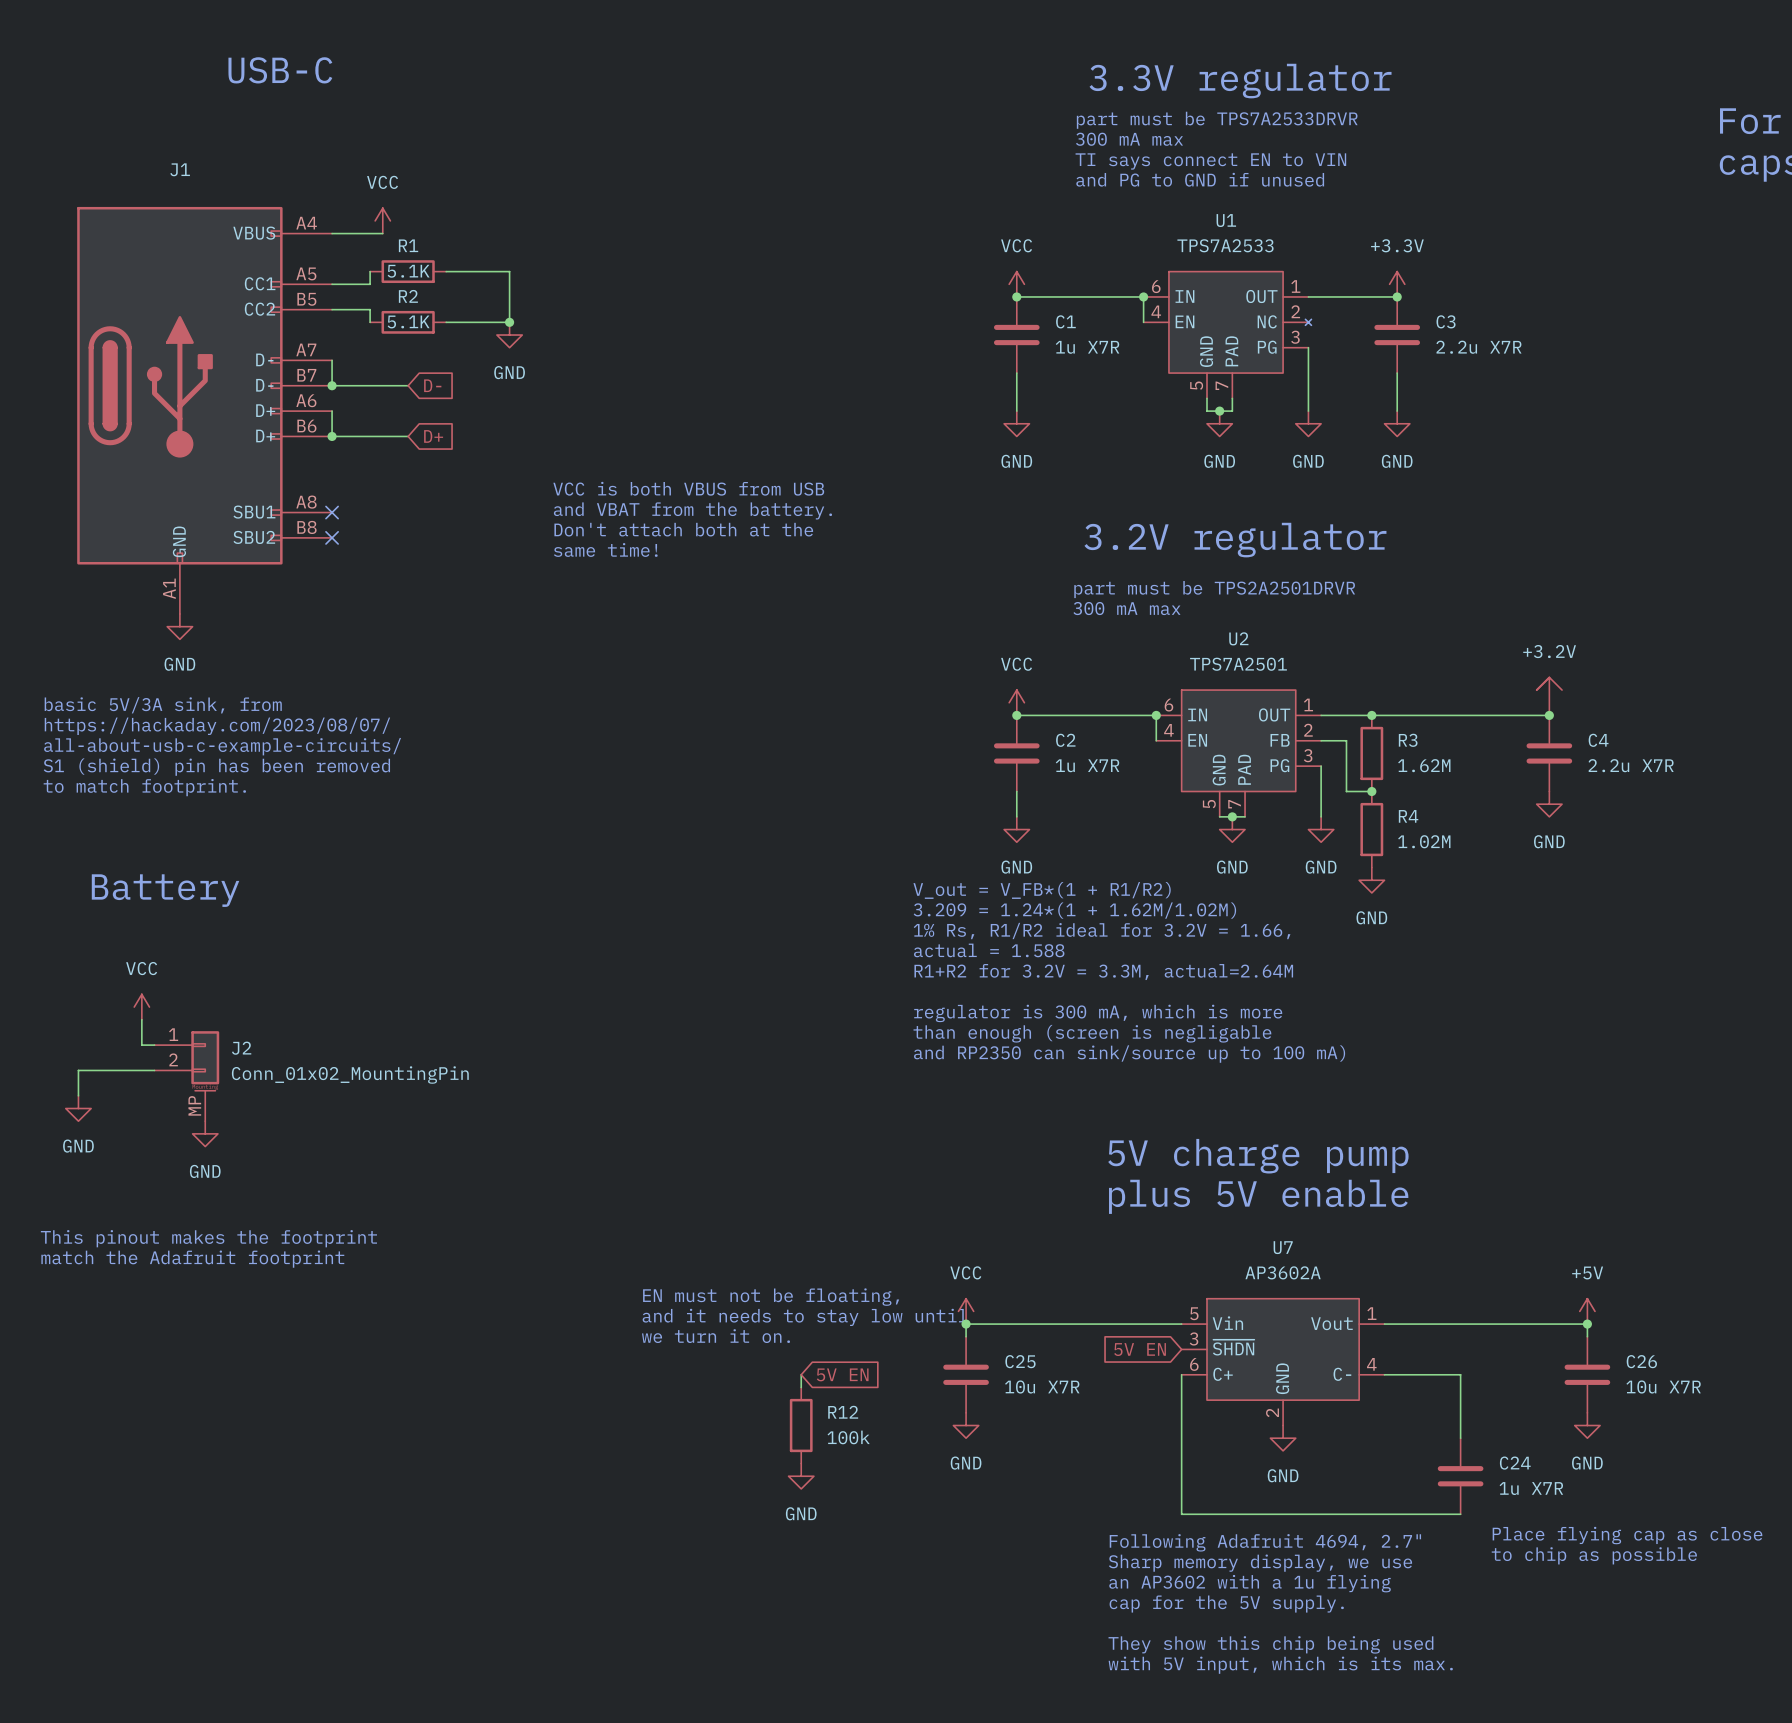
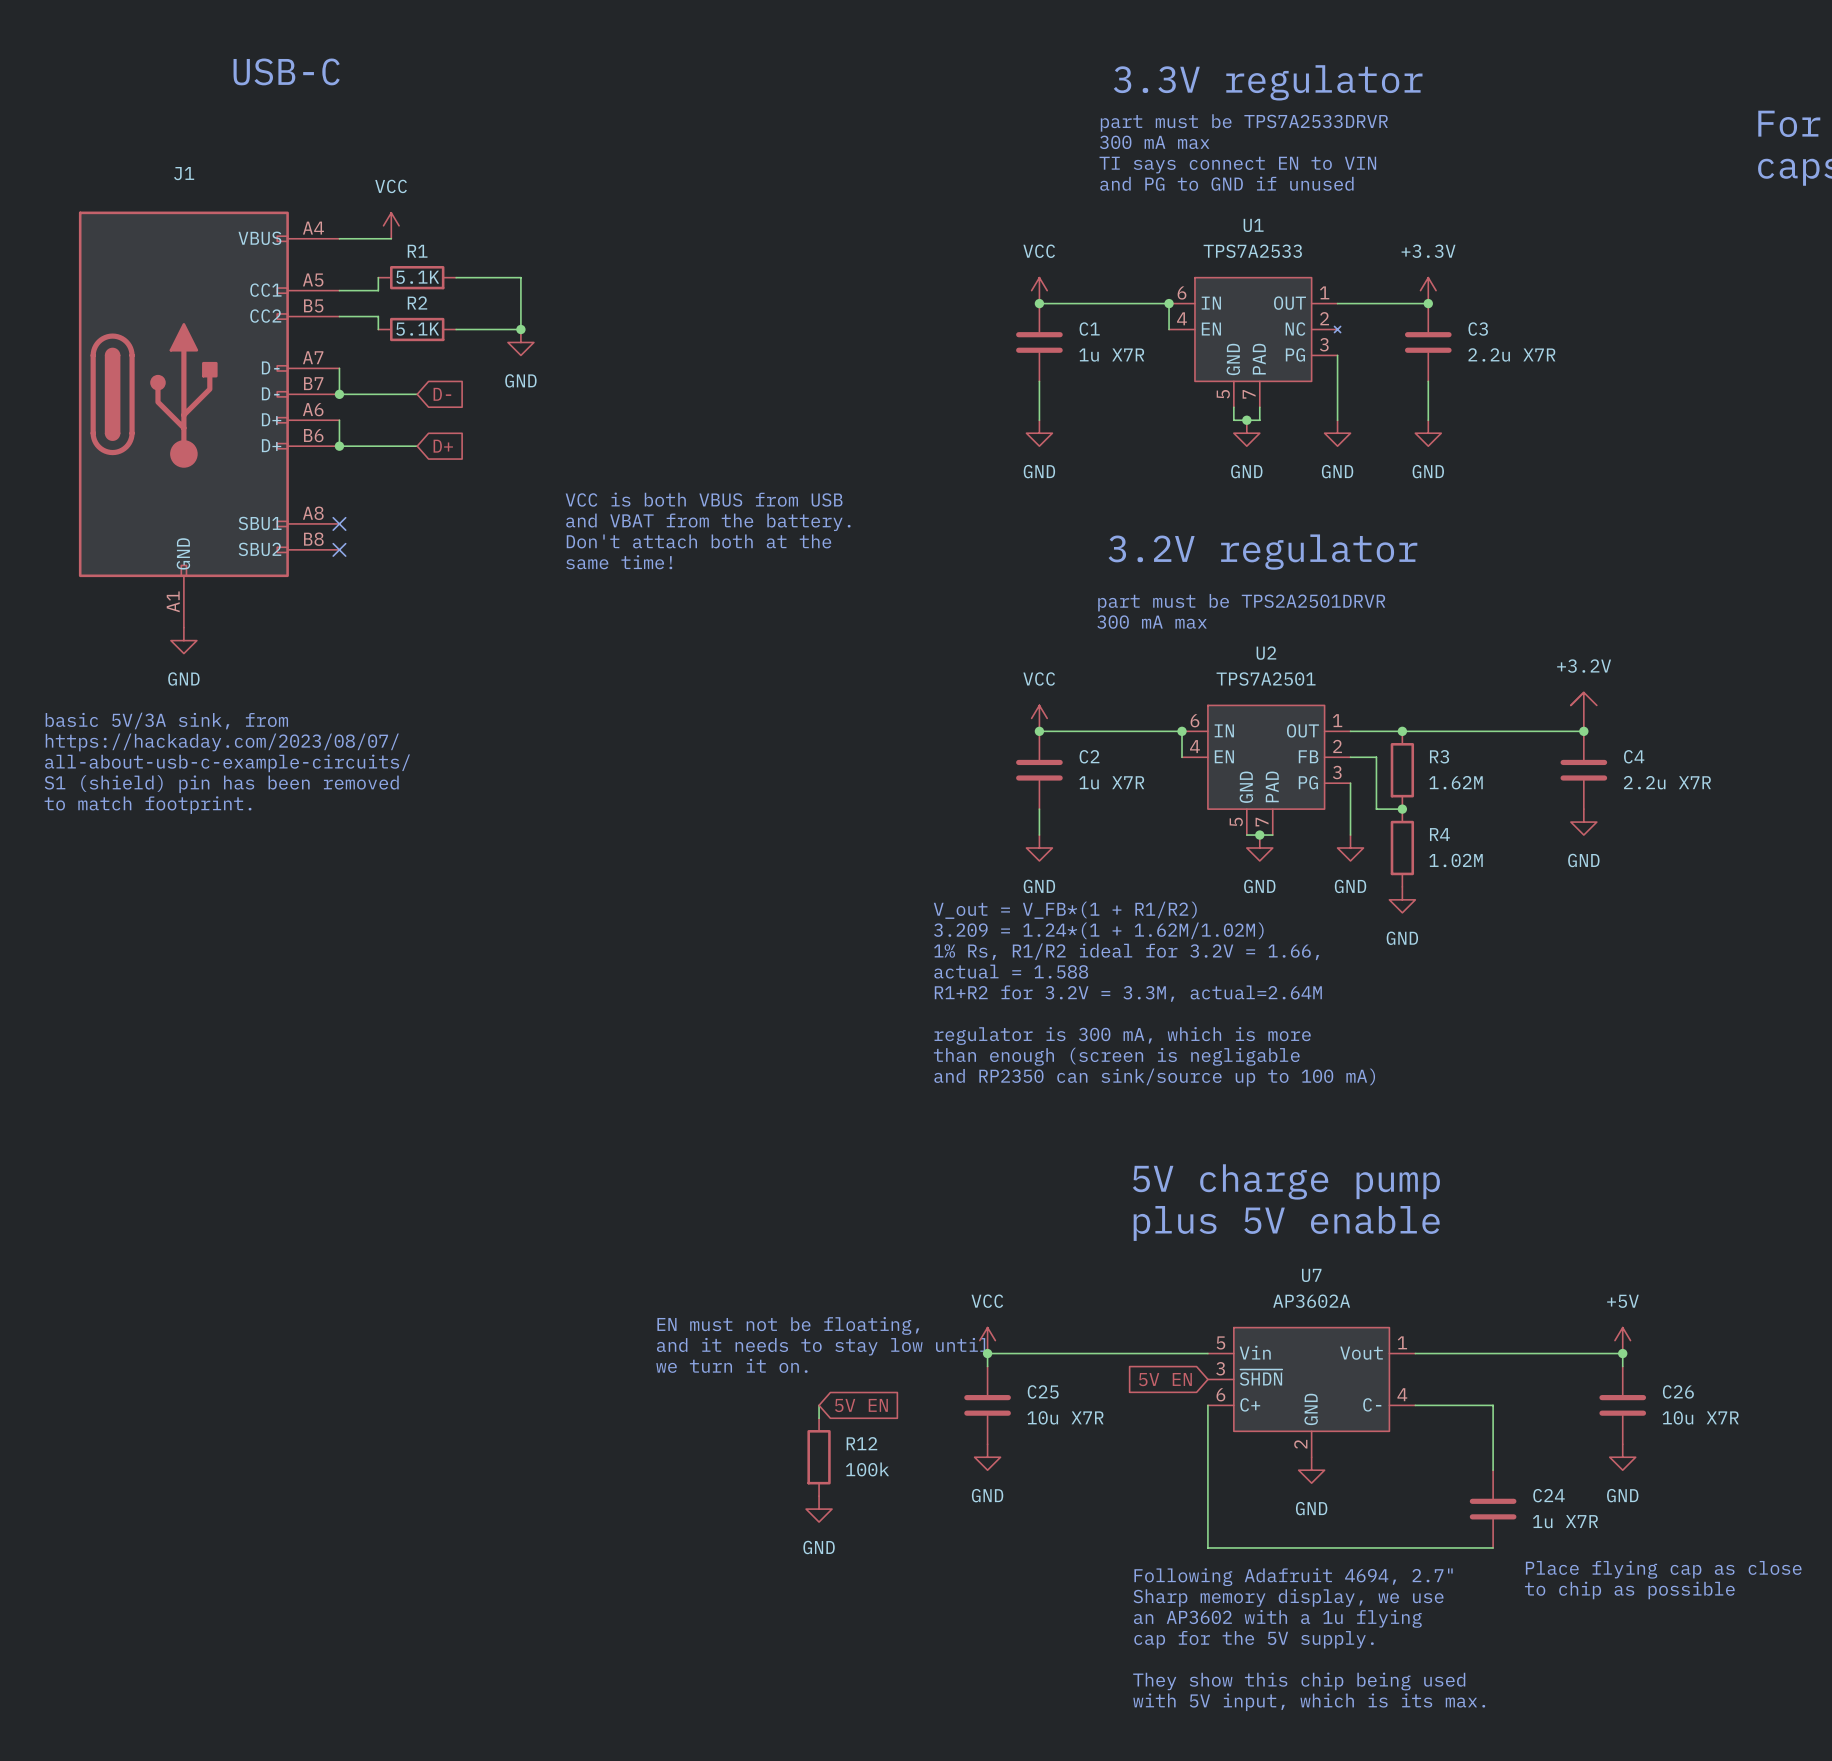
text: Battery (165, 890) -> none
power symbol: VCC (141, 1007) -> none
wire: (141, 1019) (141, 1045) (154, 1045) -> none
wire: (154, 1070) (78, 1070) (78, 1095) -> none
J2: Conn_01x02_MountingPin (186, 1076) -> none
power symbol: GND (78, 1108) -> none
power symbol: GND (205, 1133) -> none
text: This pinout makes the footprint (208, 1238) -> none
text: match the Adafruit footprint (192, 1259) -> none

